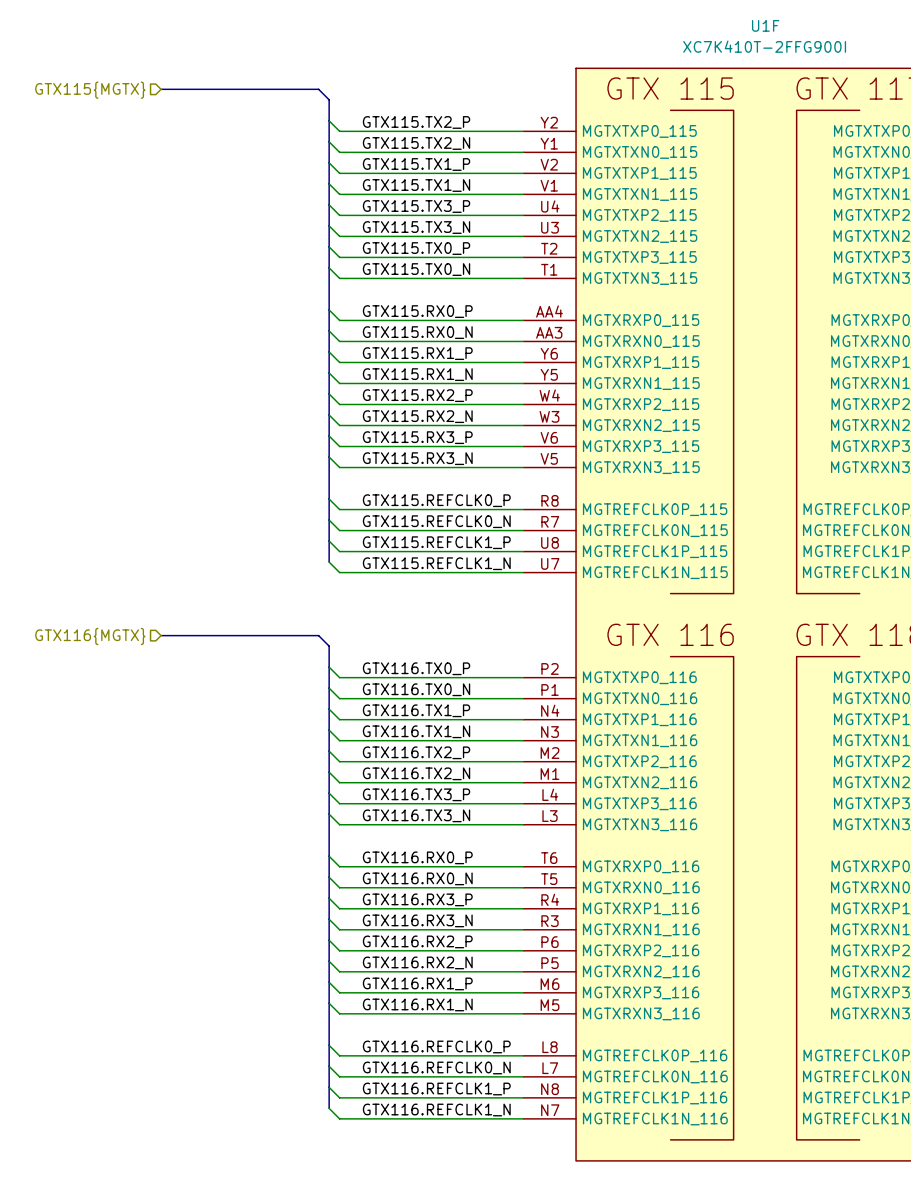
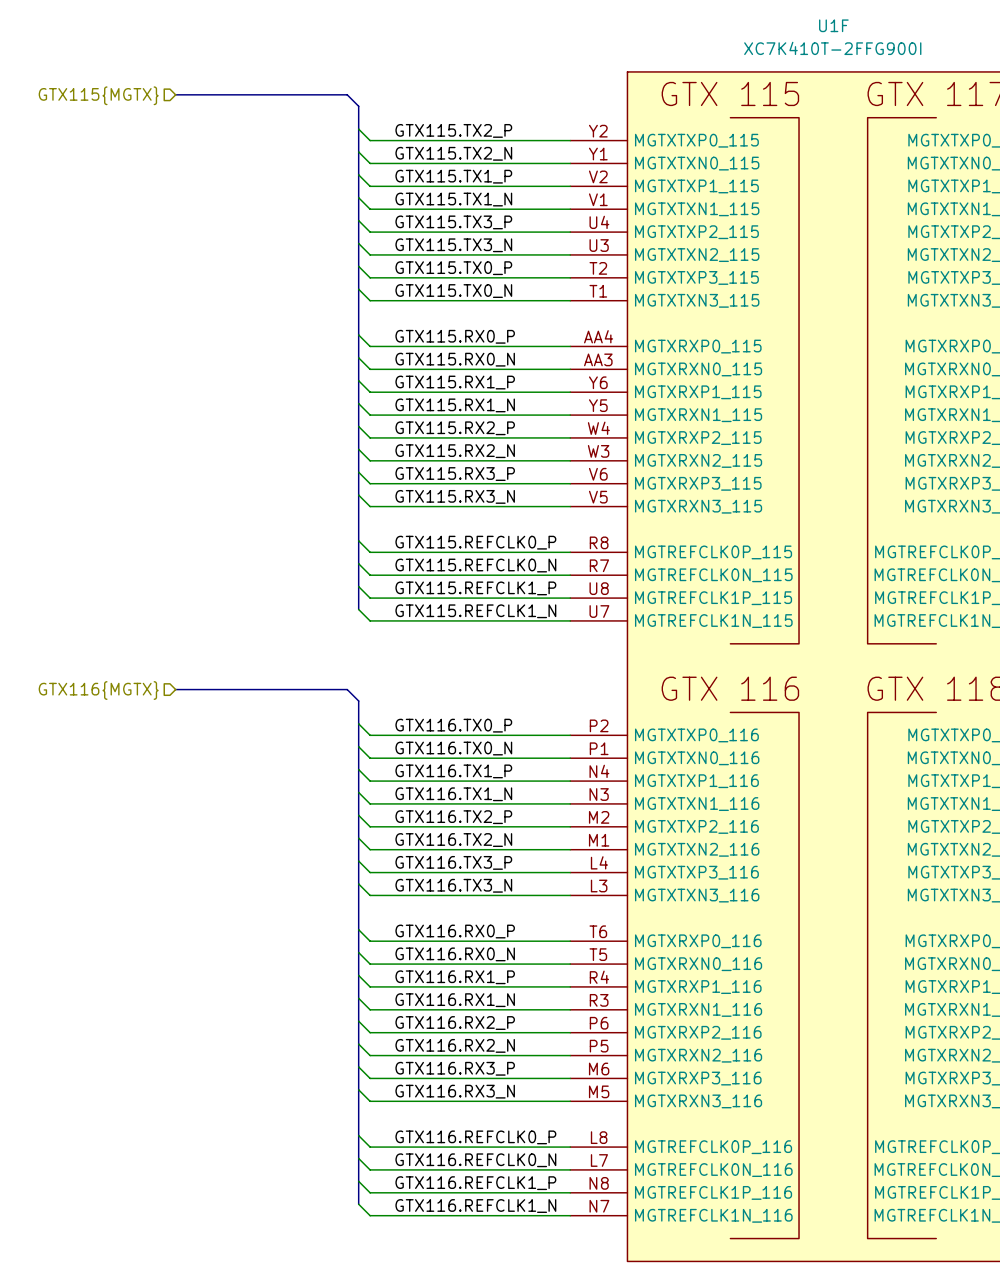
label: GTX116.RX3_P (417, 899) -> GTX116.RX1_P (455, 977)
label: GTX116.RX3_N (417, 920) -> GTX116.RX1_N (455, 1000)
label: GTX116.RX1_P (417, 983) -> GTX116.RX3_P (455, 1068)
label: GTX116.RX1_N (417, 1004) -> GTX116.RX3_N (455, 1091)

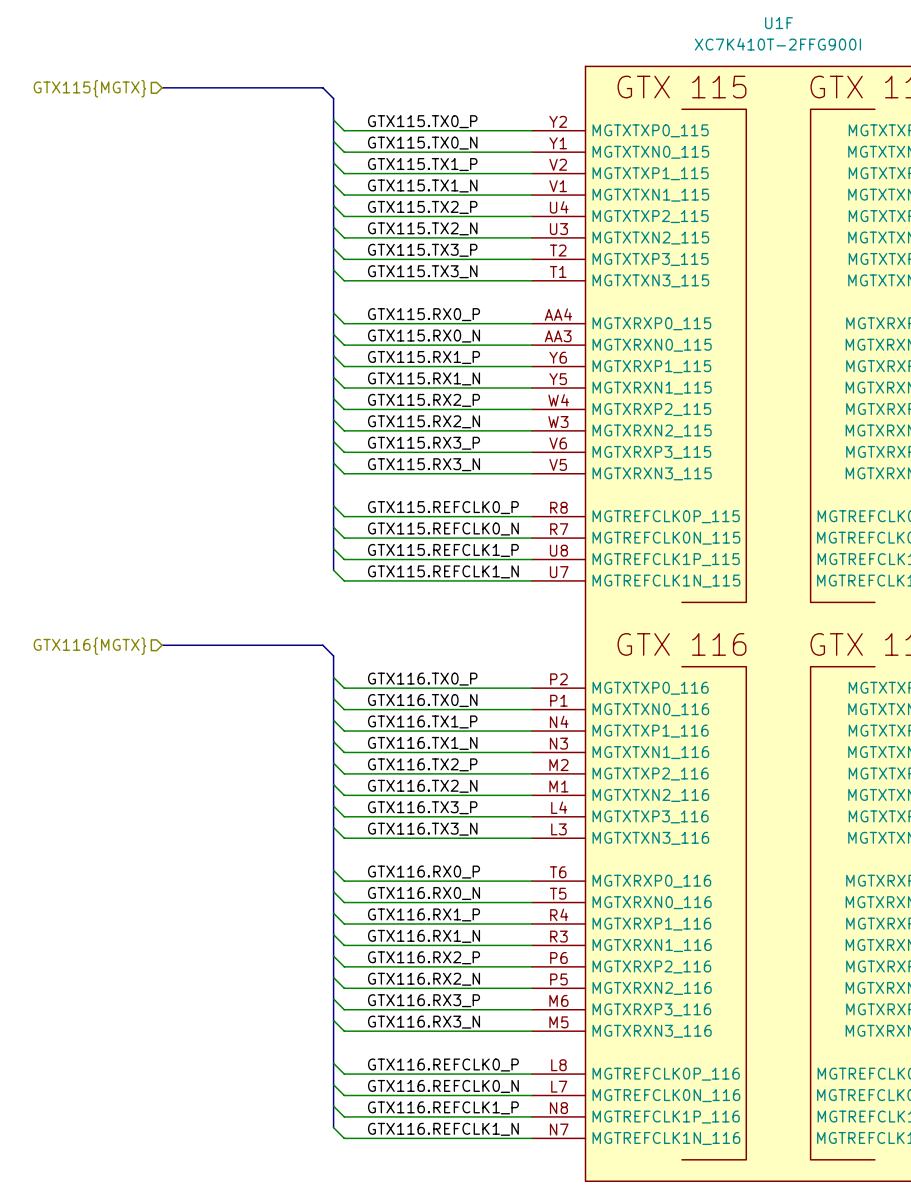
label: GTX115.TX2_P (453, 130) -> GTX115.TX0_P (422, 121)
label: GTX115.TX2_N (453, 153) -> GTX115.TX0_N (422, 143)
label: GTX115.TX3_P (453, 222) -> GTX115.TX2_P (422, 207)
label: GTX115.TX3_N (453, 245) -> GTX115.TX2_N (422, 228)
label: GTX115.TX0_P (453, 268) -> GTX115.TX3_P (422, 250)
label: GTX115.TX0_N (453, 291) -> GTX115.TX3_N (422, 271)

